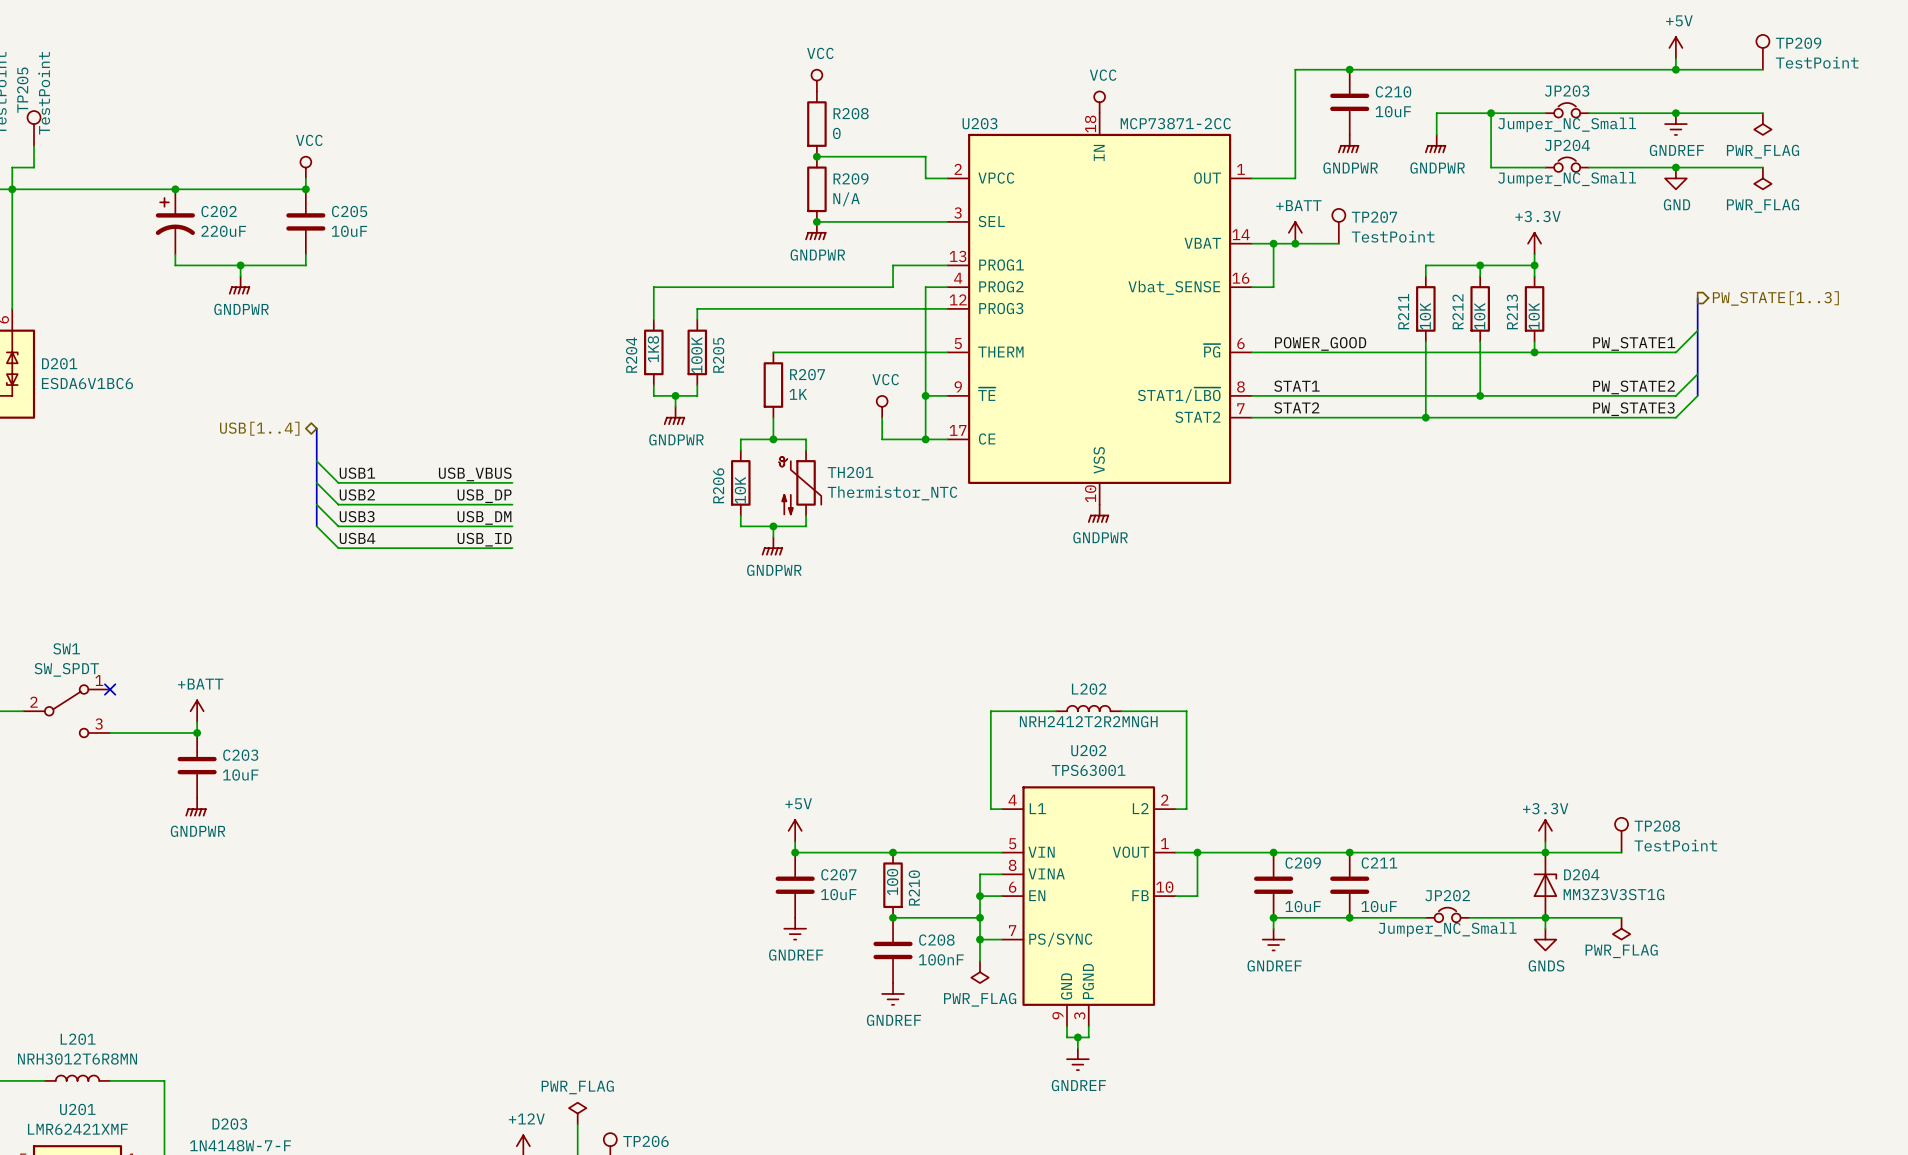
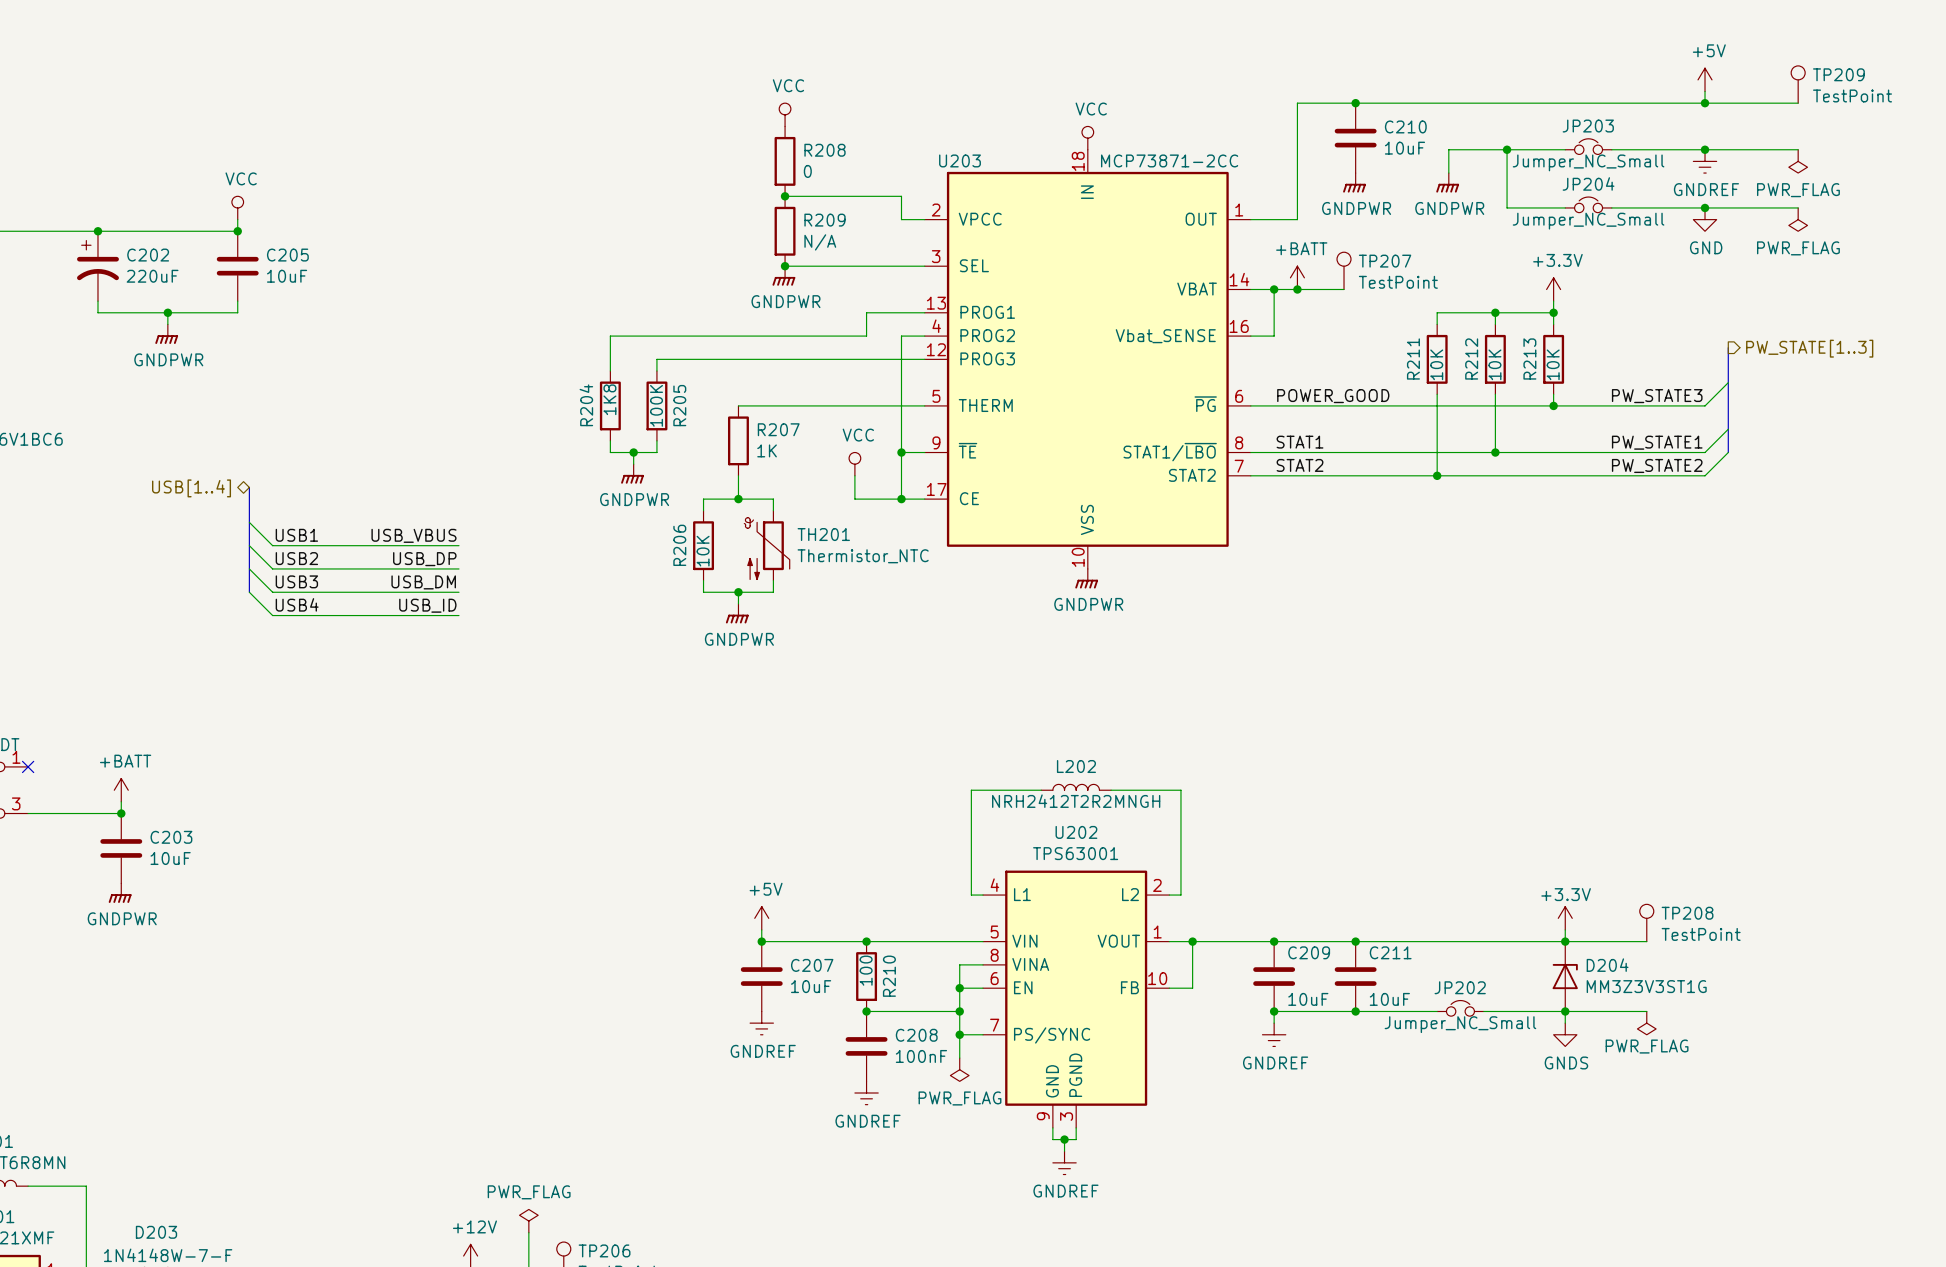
label: PW_STATE1 (1634, 343) -> PW_STATE3 (1657, 396)
label: PW_STATE2 (1634, 387) -> PW_STATE1 (1657, 442)
label: PW_STATE3 (1633, 409) -> PW_STATE2 (1657, 465)

